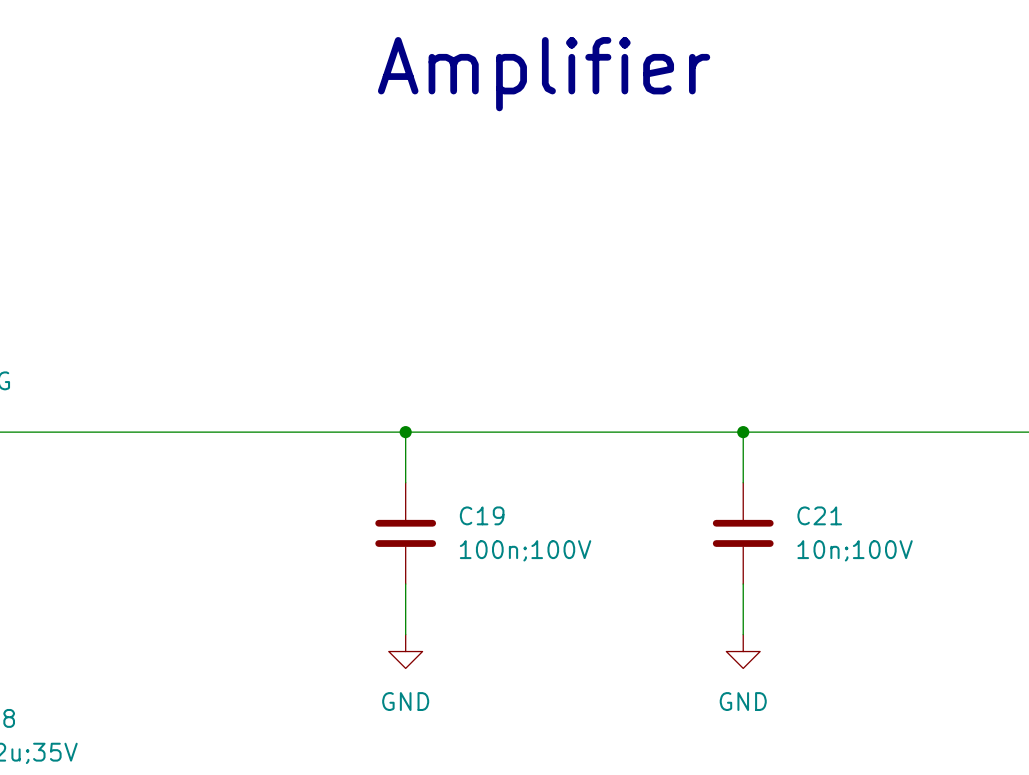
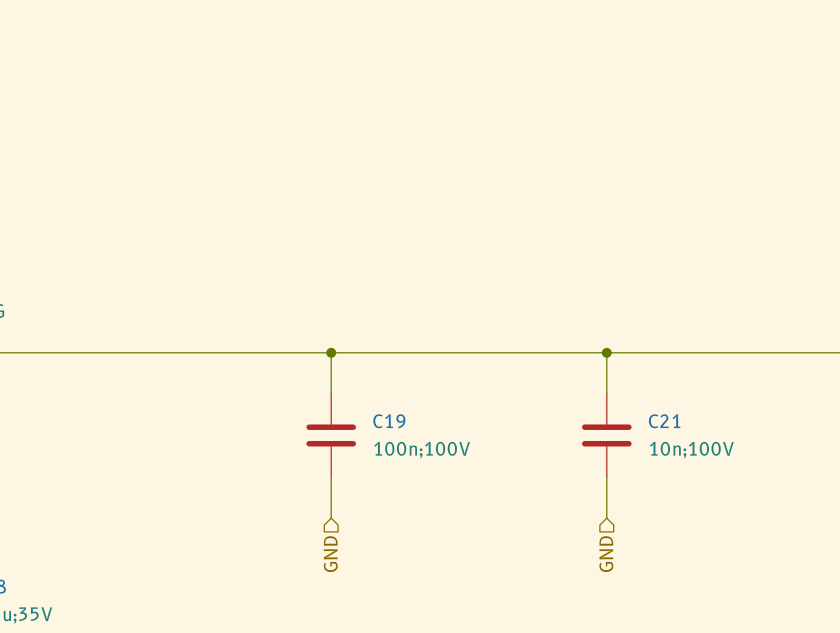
text: Amplifier (544, 74) -> none
power symbol: GND (405, 651) -> none
power symbol: GND (743, 651) -> none
hierarchical label: none -> GND (330, 554)
hierarchical label: none -> GND (606, 554)

